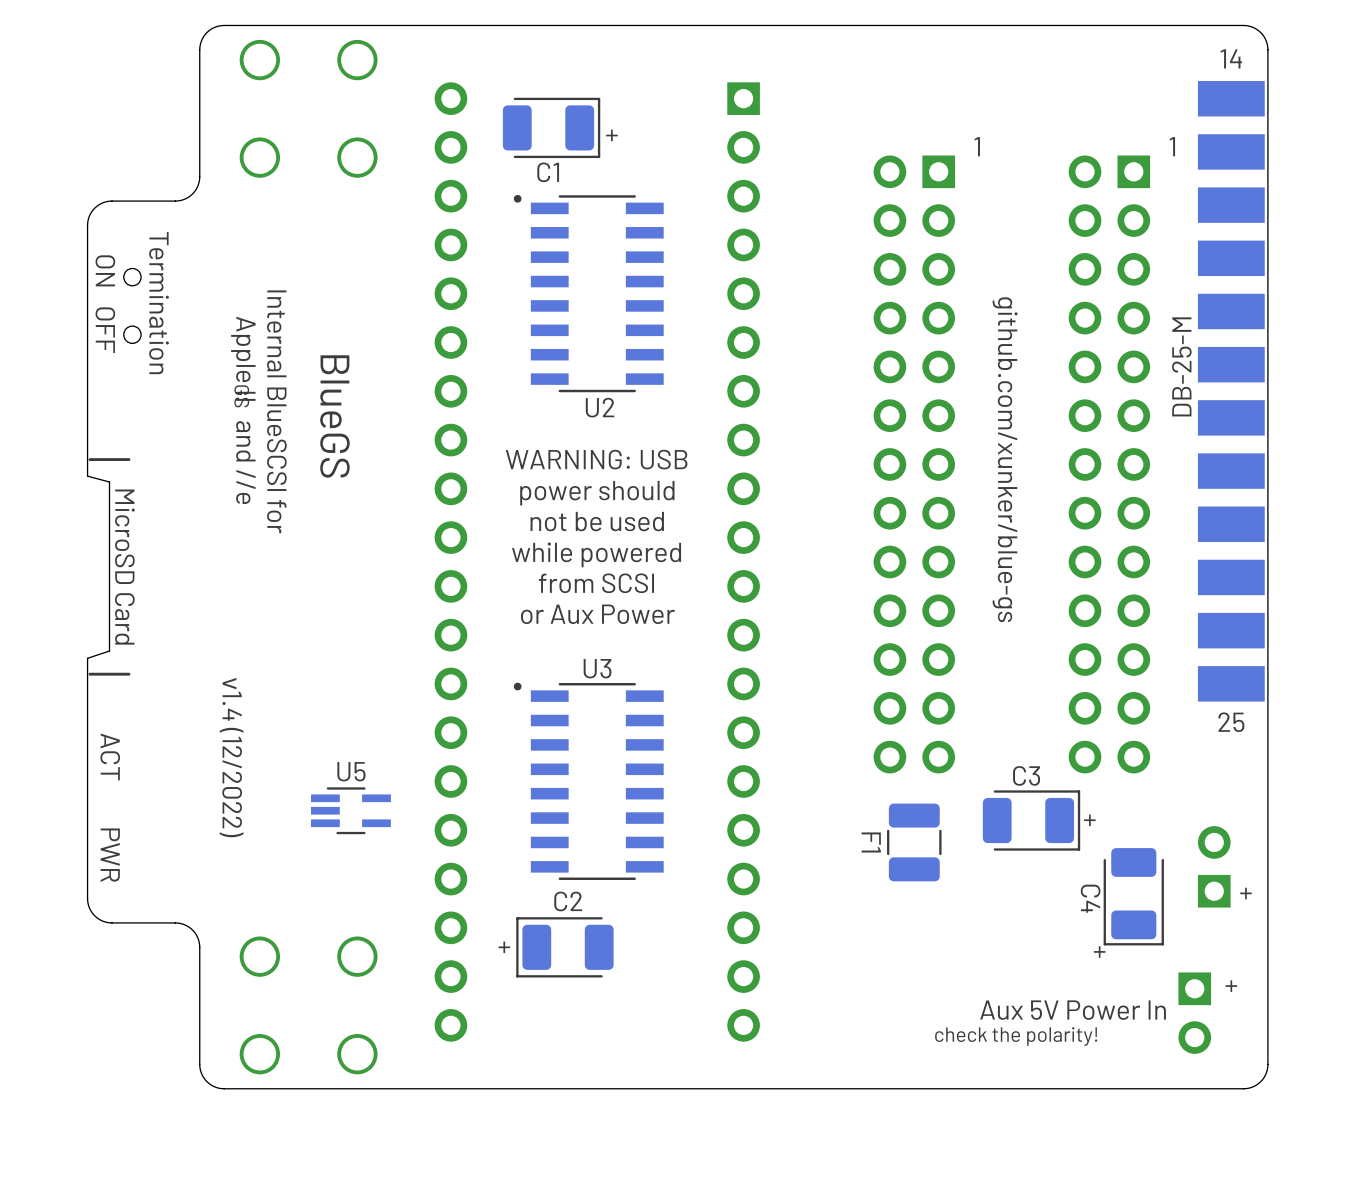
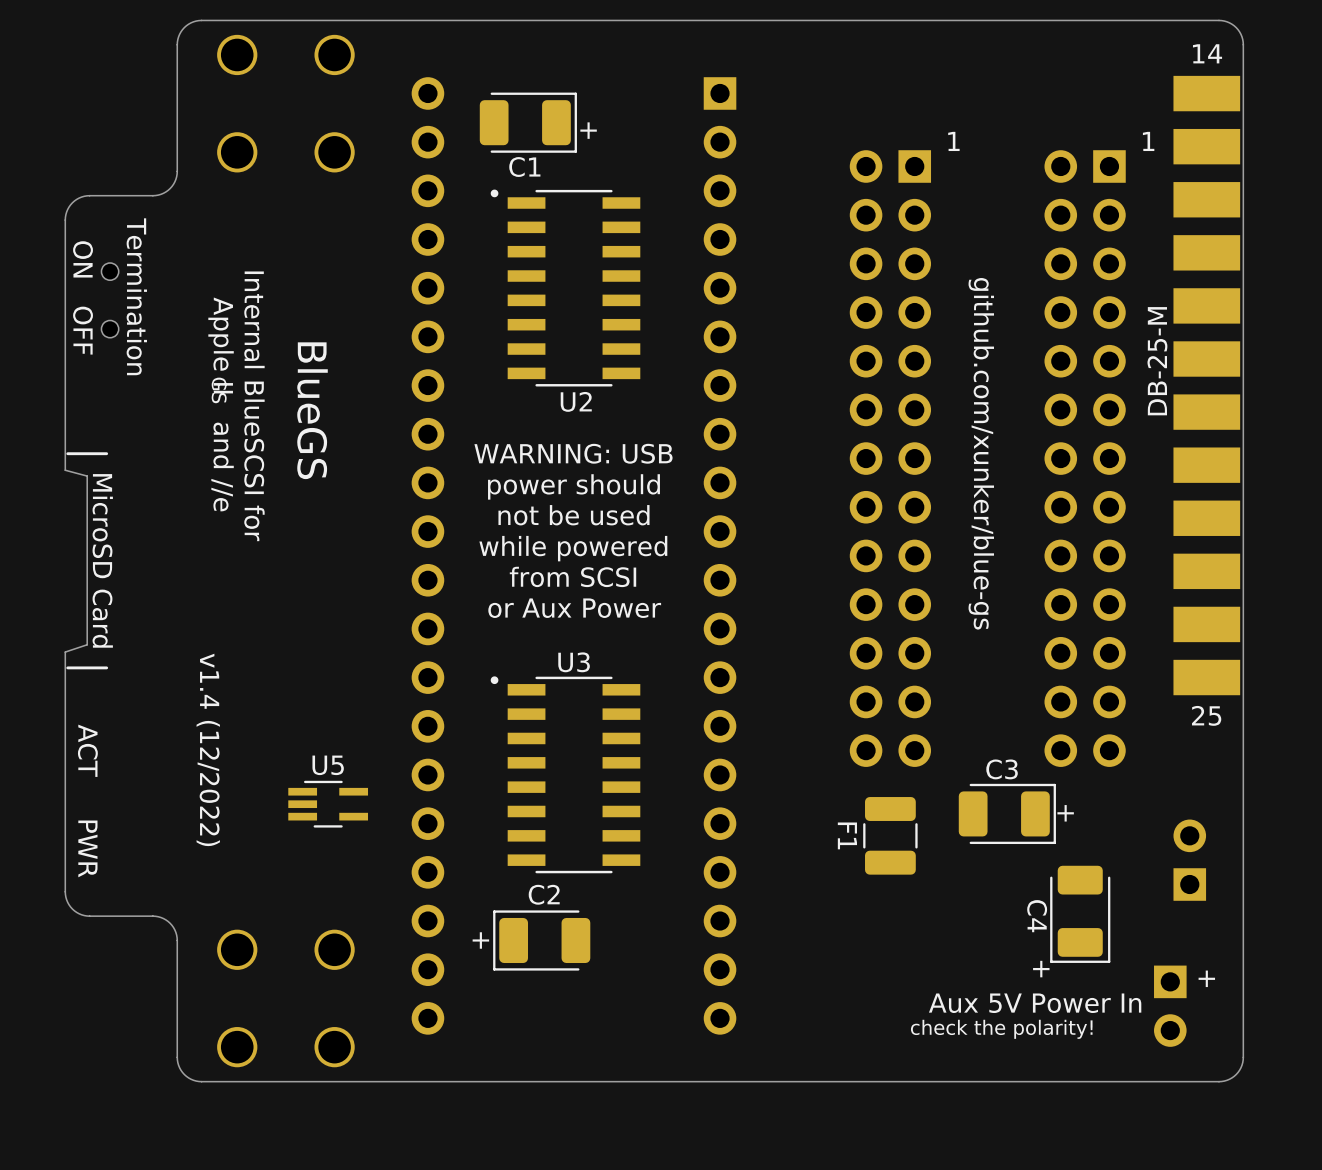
text: + (1245, 893) -> none
C4 position: (1133, 896) -> (1080, 914)
text position: + (1099, 952) -> + (1041, 969)

